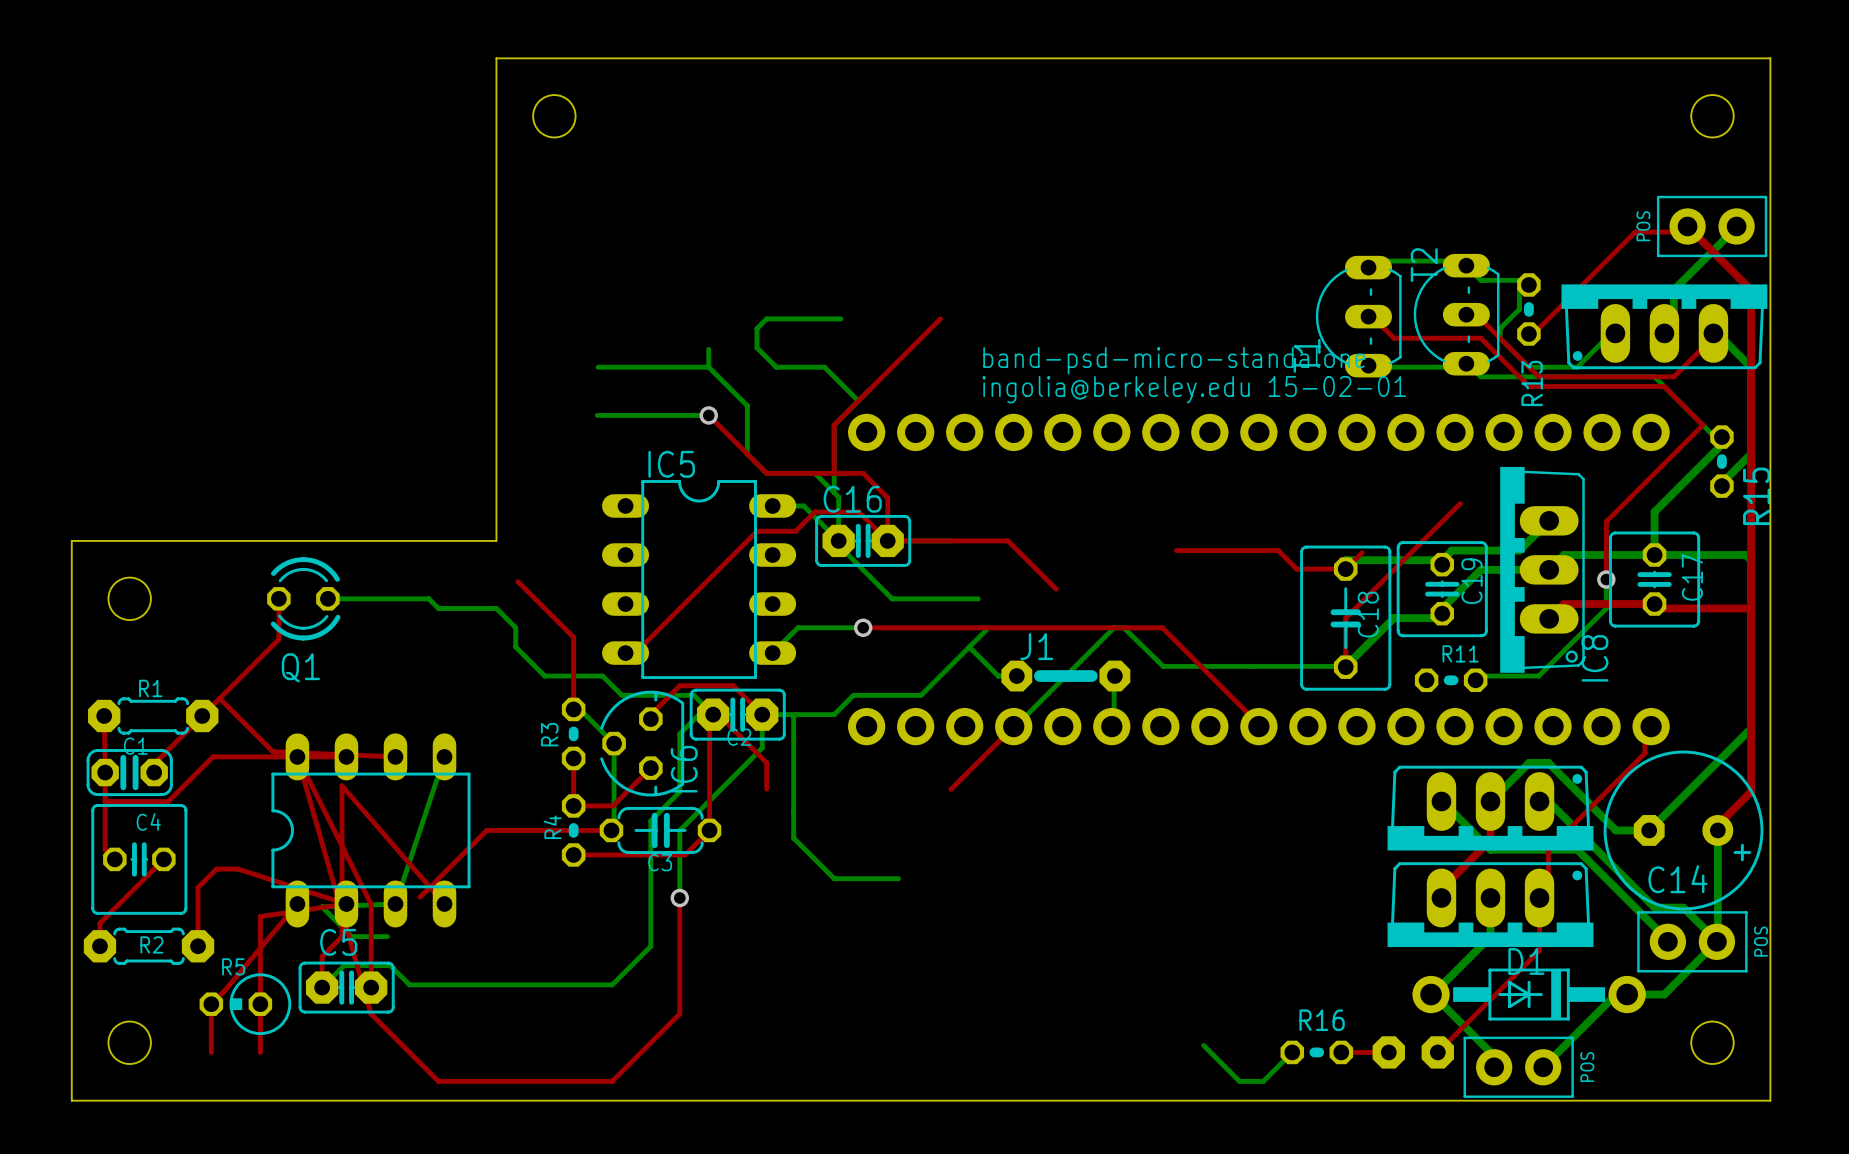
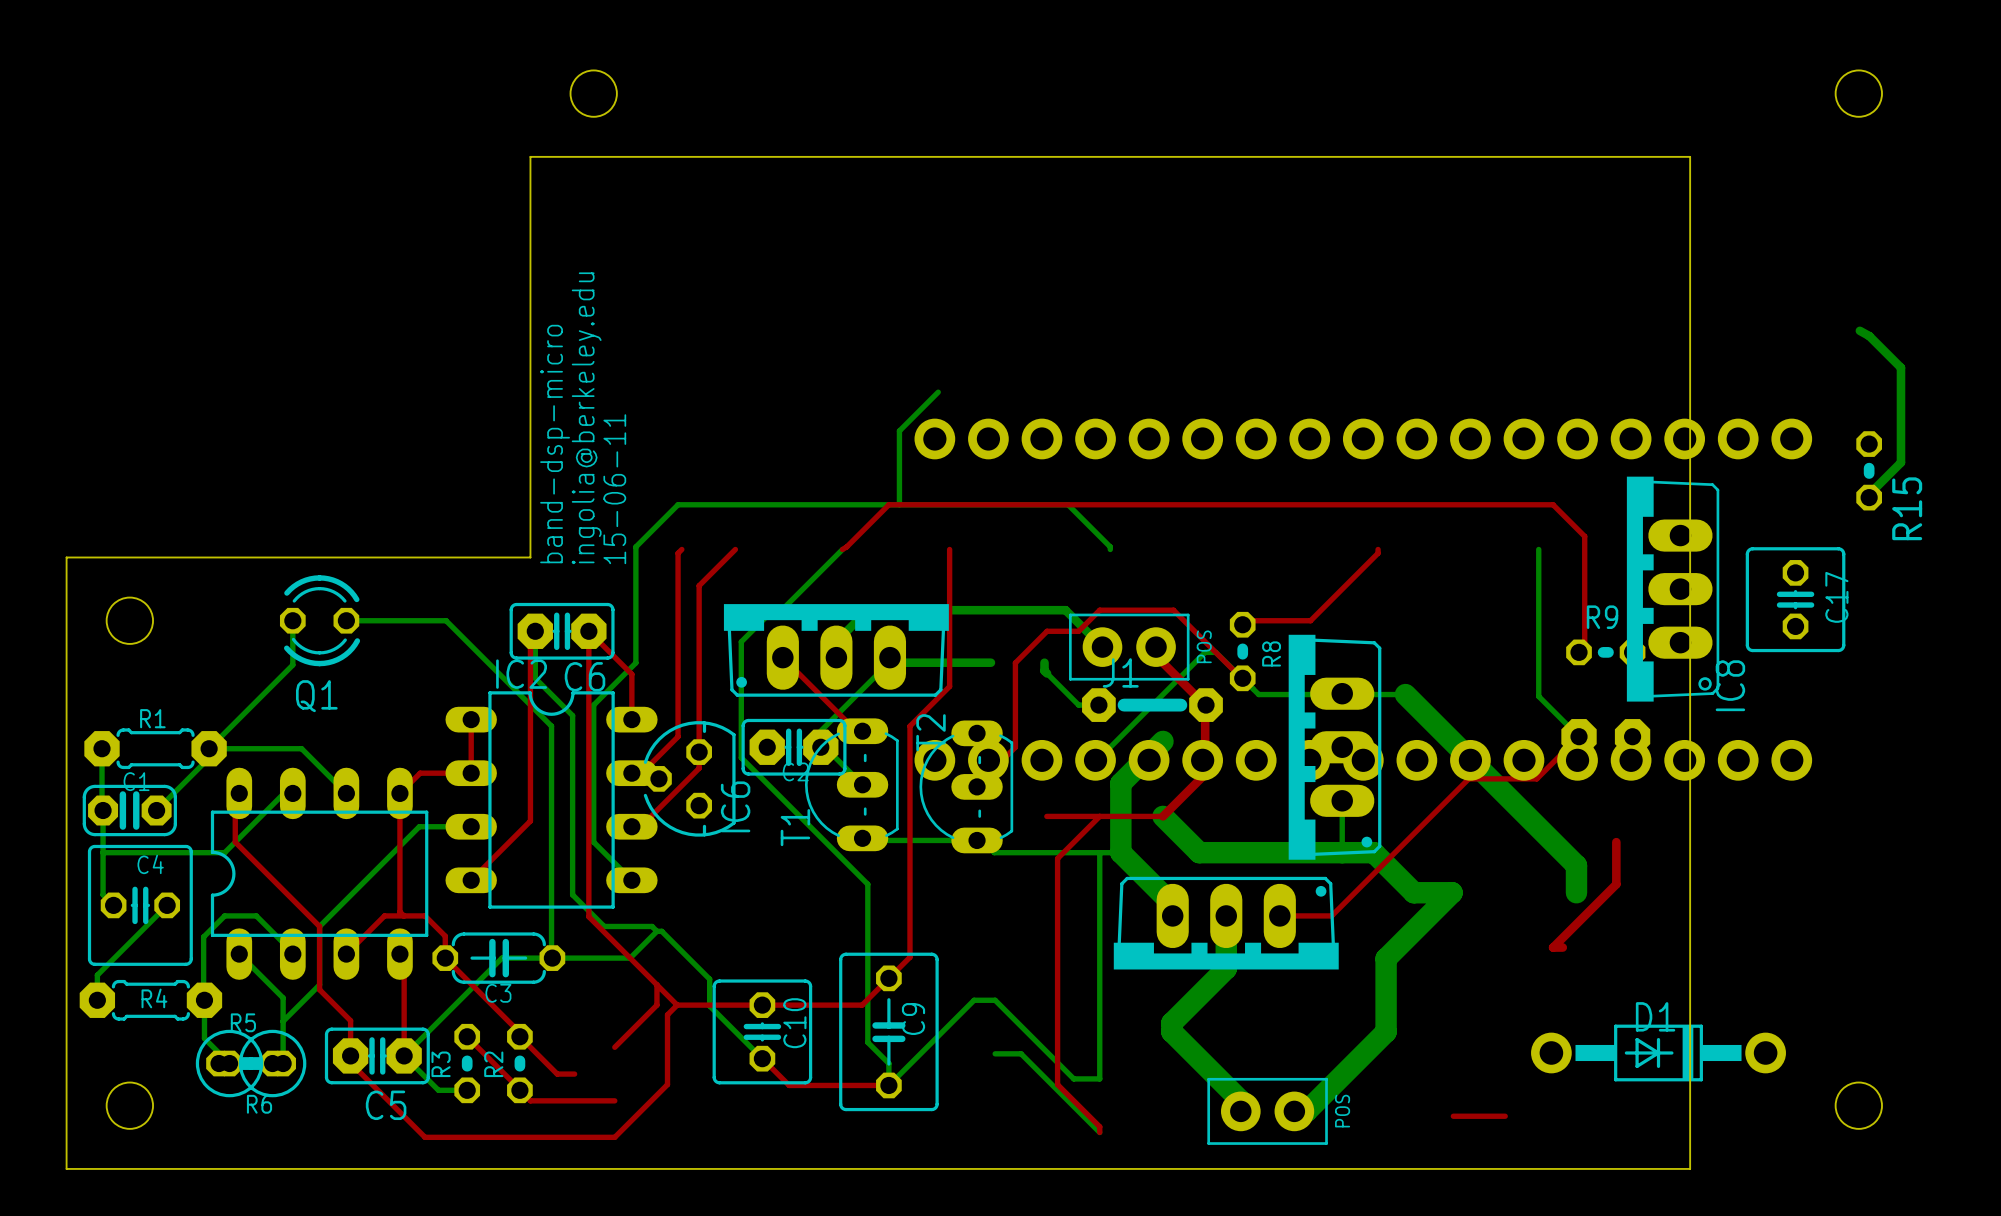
board edge: (496, 174) (496, 58) (1770, 58) (1770, 1100) (1558, 1100) -> (530, 156) (1690, 156) (1690, 1168)
part: (1712, 226) -> none
bottom track: (1736, 226) (1673, 289) (1673, 328) (1664, 333) -> none
bottom track: (1368, 267) (1374, 261) (1461, 261) (1480, 280) (1519, 280) (1528, 284) (1519, 289) (1519, 309) (1500, 328) (1500, 338) (1529, 367) (1577, 367) (1606, 338) (1615, 333) -> none
R13: (1528, 309) -> none
T2 position: (1456, 314) -> (966, 786)
top track: (1466, 314) (1480, 318) (1538, 376) (1673, 376) (1712, 338) (1713, 333) -> none
T1 position: (1358, 316) -> (851, 784)
top track: (1368, 316) (1374, 318) (1393, 338) (1480, 338) (1529, 386) (1664, 386) (1702, 425) (1606, 521) (1606, 579) -> none
bottom track: (840, 318) (766, 318) (757, 328) (757, 347) (776, 367) (824, 367) (858, 400) -> none
top track: (940, 318) (834, 425) (834, 473) -> none
part: (1664, 326) -> none
top track: (1528, 333) (1529, 338) (1635, 232) (1683, 232) (1687, 226) (1751, 289) (1751, 791) (1717, 825) (1717, 830) -> none
bottom track: (708, 349) (708, 367) -> none
text: band-psd-micro-standalone (1174, 360) -> none
bottom track: (1368, 365) (1461, 367) (1466, 363) (1480, 376) (1654, 376) (1712, 434) (1721, 437) (1722, 444) (1654, 511) (1654, 545) (1664, 555) -> none
bottom track: (598, 367) (708, 367) -> none
bottom track: (708, 367) (747, 405) (747, 454) (766, 473) (814, 473) (838, 497) (838, 545) (892, 598) (978, 598) -> none
text: ingolia@berkeley.edu 15-02-01 (1194, 389) -> none
text: none -> ingolia@berkeley.edu (586, 418)
bottom track: (597, 415) (708, 415) -> none
top track: (708, 415) (766, 473) (863, 473) (887, 497) (887, 540) -> none
via: (708, 415) -> none
text: none -> band-dsp-micro (555, 444)
text: none -> 15-06-11 (614, 489)
top track: (1460, 503) (1345, 618) (1345, 667) -> none
bottom track: (772, 505) (803, 505) (838, 540) -> none
bottom track: (1549, 520) (1519, 550) (1451, 550) (1442, 560) -> none
top track: none -> (681, 549) (678, 553) (678, 736) (641, 773) (631, 773)
bottom track: none -> (842, 549) (781, 610) (772, 610) (741, 641) (741, 757) (867, 884) (867, 1042) (888, 1063) (888, 1085) (974, 1000) (995, 1000) (1073, 1078) (1099, 1078) (1099, 852)
top track: none -> (842, 549) (888, 504) (1553, 504) (1584, 536) (1584, 652) (1579, 652)
top track: none -> (949, 549) (949, 686) (909, 726) (909, 957) (862, 1005) (677, 1005)
bottom track: none -> (1110, 549) (1110, 546) (1068, 504) (678, 504) (635, 546) (635, 662) (593, 705) (593, 842) (631, 880)
top track: none -> (1378, 549) (1378, 553) (1310, 620) (1246, 620) (1242, 624)
bottom track: none -> (1538, 549) (1538, 696) (1579, 736)
C16: (863, 540) -> none
top track: (887, 540) (1007, 540) (1056, 589) -> none
top track: (887, 540) (858, 511) (814, 511) (795, 531) (757, 531) (641, 647) (631, 647) (625, 653) -> none
top track: (1176, 550) (1278, 550) (1296, 569) (1345, 569) (1362, 552) -> none
bottom track: (1442, 560) (1345, 560) (1345, 569) -> none
IC5: (699, 579) -> none
bottom track: (1606, 579) (1606, 608) (1538, 676) (1480, 676) (1475, 680) -> none
via: (1606, 579) -> none
top track: (517, 581) (573, 637) (573, 709) -> none
C19: (1442, 589) -> none
bottom track: none -> (292, 620) (292, 665) (209, 748)
top track: (278, 598) (278, 639) (154, 764) (154, 772) -> none
bottom track: (419, 598) (428, 598) (438, 608) (496, 608) (515, 627) (515, 647) (544, 676) (602, 676) (621, 695) (693, 695) (713, 714) (699, 714) (679, 733) (679, 791) (650, 820) (650, 946) (612, 984) (409, 984) (390, 965) (344, 965) (322, 987) -> (446, 620) (551, 726) (552, 958)
bottom track: none -> (535, 631) (535, 678) (572, 715) (572, 894) (604, 926) (652, 926) (656, 931)
top track: none -> (535, 631) (535, 641) (530, 646) (530, 821) (471, 880)
C6: none -> (562, 631)
top track: (1751, 608) (1659, 608) (1654, 604) (1564, 604) (1549, 618) -> none
C18: (1345, 618) -> none
bottom track: none -> (1102, 647) (1065, 610) (867, 610) (836, 641) (836, 657)
part: none -> (1129, 647)
top track: none -> (1156, 647) (1156, 655) (1205, 705) (1205, 774) (1163, 816) (1046, 816)
part: none -> (836, 650)
bottom track: (863, 627) (797, 627) (772, 653) -> none
top track: (863, 627) (1162, 627) (1258, 724) -> none
via: (863, 627) -> none
R8: none -> (1242, 651)
R9: none -> (1605, 652)
bottom track: (987, 628) (921, 695) (853, 695) (834, 714) (762, 714) (762, 748) (679, 830) (679, 898) -> none
top track: none -> (782, 657) (856, 731) (862, 731)
bottom track: none -> (990, 662) (895, 662) (889, 657) (889, 661) (815, 736) (862, 784)
bottom track: none -> (1044, 662) (1044, 670) (1047, 673)
top track: none -> (1242, 678) (1173, 610) (1099, 610) (1078, 631) (1047, 631) (1015, 662) (1015, 747) (977, 786)
bottom track: (1297, 666) (1345, 666) -> (1405, 694) (1576, 865) (1576, 892)
bottom track: (1345, 666) (1393, 618) (1442, 618) (1442, 608) (1480, 569) (1549, 569) (1564, 555) (1745, 555) (1751, 560) (1751, 728) (1649, 830) (1615, 830) (1548, 762) (1529, 762) (1490, 801) -> none
R11: (1451, 680) -> none
top track: none -> (471, 719) (471, 773) (420, 773) (399, 793) (399, 911) (403, 915)
top track: none -> (631, 719) (631, 674) (588, 631) (588, 916) (677, 1005)
top track: (219, 698) (272, 751) (395, 756) -> none
top track: none -> (1579, 736) (1536, 778) (1468, 778) (1331, 915) (1279, 915)
bottom track: (573, 709) (579, 709) (614, 743) (614, 827) (611, 830) -> none
bottom track: none -> (1163, 741) (1120, 783) (1120, 852)
top track: (650, 714) (679, 685) (733, 685) (762, 714) -> (699, 747) (699, 585) (735, 549)
bottom track: (795, 714) (793, 716) (793, 838) (834, 878) (898, 878) -> none
part: none -> (1335, 747)
bottom track: none -> (102, 748) (103, 894) (113, 905)
top track: (104, 715) (104, 713) (105, 849) (114, 859) -> none
bottom track: none -> (209, 748) (301, 748) (346, 793)
bottom track: none -> (209, 748) (209, 758) (156, 810)
top track: none -> (699, 752) (699, 768) (640, 826) (631, 826)
top track: (1013, 726) (951, 789) -> none
R3 position: (573, 733) -> (467, 1063)
top track: (1644, 733) (1644, 753) (1548, 849) (1548, 898) (1539, 898) (1539, 950) (1437, 1052) -> none
top track: none -> (239, 793) (235, 797) (235, 842) (319, 926) (319, 989) (350, 1020) (350, 1062) (425, 1137) (614, 1137) (667, 1084) (667, 1014) (677, 1005)
bottom track: none -> (292, 793) (283, 793) (224, 852) (103, 852)
top track: (346, 756) (212, 756) (168, 801) (105, 801) -> none
bottom track: (444, 756) (395, 903) (321, 906) (351, 936) (387, 936) -> none
top track: (573, 758) (573, 805) (613, 805) (650, 768) -> none
IC2: none -> (551, 799)
bottom track: none -> (1342, 800) (1342, 852)
top track: none -> (1099, 816) (1057, 858) (1057, 1084) (1099, 1126) (1099, 1132)
bottom track: none -> (1163, 816) (1199, 852) (1373, 852) (1413, 892) (1452, 892) (1386, 958) (1386, 1031) (1306, 1111) (1294, 1111)
bottom track: none -> (471, 826) (419, 826) (319, 926) (319, 984) (283, 1021)
top track: (766, 789) (766, 762) (718, 714) (713, 714) (709, 718) (709, 830) (685, 854) (573, 854) -> none
bottom track: none -> (862, 838) (864, 840) (982, 840) (994, 852) (1120, 852)
bottom track: (1441, 801) (1490, 849) (1577, 849) (1667, 941) -> none
bottom track: (1539, 801) (1548, 801) (1654, 907) (1683, 907) (1716, 941) -> none
part: (1490, 808) -> none
bottom track: none -> (1120, 852) (1172, 904) (1172, 915)
part position: (370, 830) -> (319, 873)
R4: (573, 830) -> none
top track: (611, 830) (486, 830) (420, 897) -> none
C3 position: (660, 830) -> (498, 958)
C14: (1683, 830) -> none
bottom track: (1717, 830) (1716, 941) -> none
bottom track: none -> (167, 905) (97, 975) (97, 1000)
top track: (163, 859) (99, 923) (99, 946) -> none
bottom track: none -> (1226, 915) (1226, 968) (1171, 1023) (1171, 1031) (1240, 1100) (1240, 1111)
part: none -> (1226, 923)
bottom track: none -> (656, 931) (661, 931) (709, 979) (709, 1005) (762, 1058)
bottom track: none -> (656, 931) (630, 958) (501, 958) (404, 1055) (438, 1090) (467, 1090)
top track: (679, 898) (679, 1013) (612, 1081) (438, 1081) (370, 1013) (297, 756) (371, 904) (371, 987) -> none
via: (679, 898) -> none
bottom track: (1490, 898) (1490, 936) (1432, 994) -> none
bottom track: none -> (239, 954) (283, 997) (283, 1063)
bottom track: none -> (292, 954) (256, 915) (224, 915) (203, 937) (204, 1038) (229, 1063)
top track: (297, 903) (211, 1004) (211, 1052) -> none
top track: none -> (346, 954) (384, 915) (425, 915) (445, 936) (445, 958) (519, 1032) (519, 1036) (557, 1074) (574, 1074)
top track: none -> (399, 954) (404, 958) (404, 1055)
top track: (444, 903) (342, 785) (342, 936) (322, 956) (322, 987) -> none
part: (1490, 904) -> none
top track: none -> (656, 984) (656, 1005) (614, 1047)
part: (1692, 941) -> none
bottom track: (1716, 941) (1664, 994) (1615, 994) (1543, 1067) -> none
C5 name position: C5 (338, 942) -> C5 (386, 1105)
R2 name: R2 (151, 944) -> R4 (154, 998)
top track: (198, 946) (198, 887) (216, 869) (237, 869) (346, 903) (260, 916) (260, 1052) -> none
C10: none -> (762, 1031)
C9: none -> (888, 1031)
top track: none -> (467, 1036) (530, 1100) (614, 1100)
C5 position: (346, 987) -> (377, 1055)
bottom track: (1432, 994) (1500, 1062) (1494, 1067) -> none
bottom track: none -> (995, 1053) (1021, 1053) (1099, 1132)
top track: none -> (762, 1058) (789, 1085) (888, 1085)
R6: none -> (245, 1063)
R2: none -> (519, 1063)
bottom track: (1203, 1045) (1239, 1081) (1263, 1081) (1292, 1052) -> none
part: none -> (1267, 1111)
R16: (1316, 1052) -> none
part position: (1413, 1052) -> (1605, 736)
part: (1518, 1067) -> none

